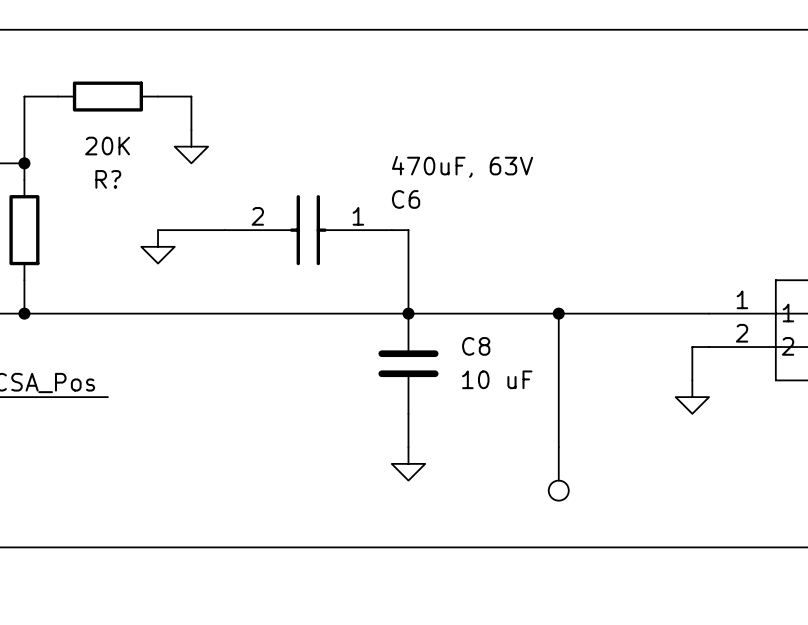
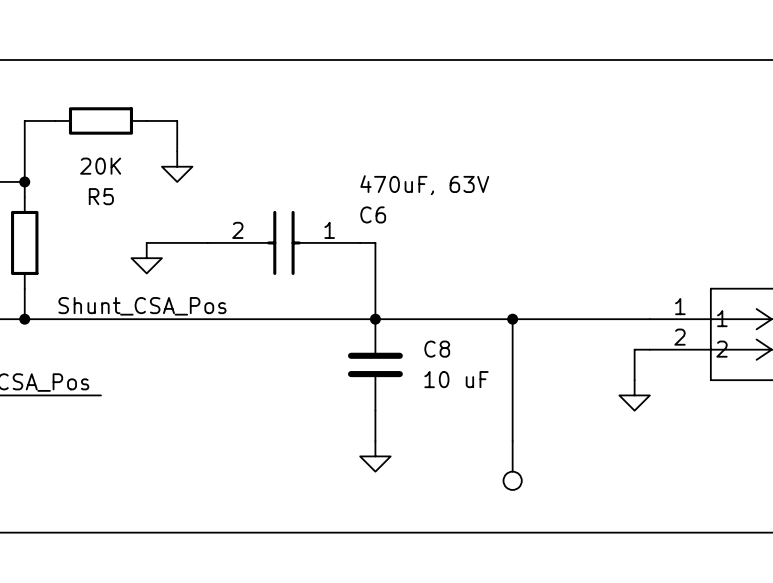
R? name: R? (108, 179) -> R5 (101, 196)
label: none -> Shunt_CSA_Pos (142, 306)

